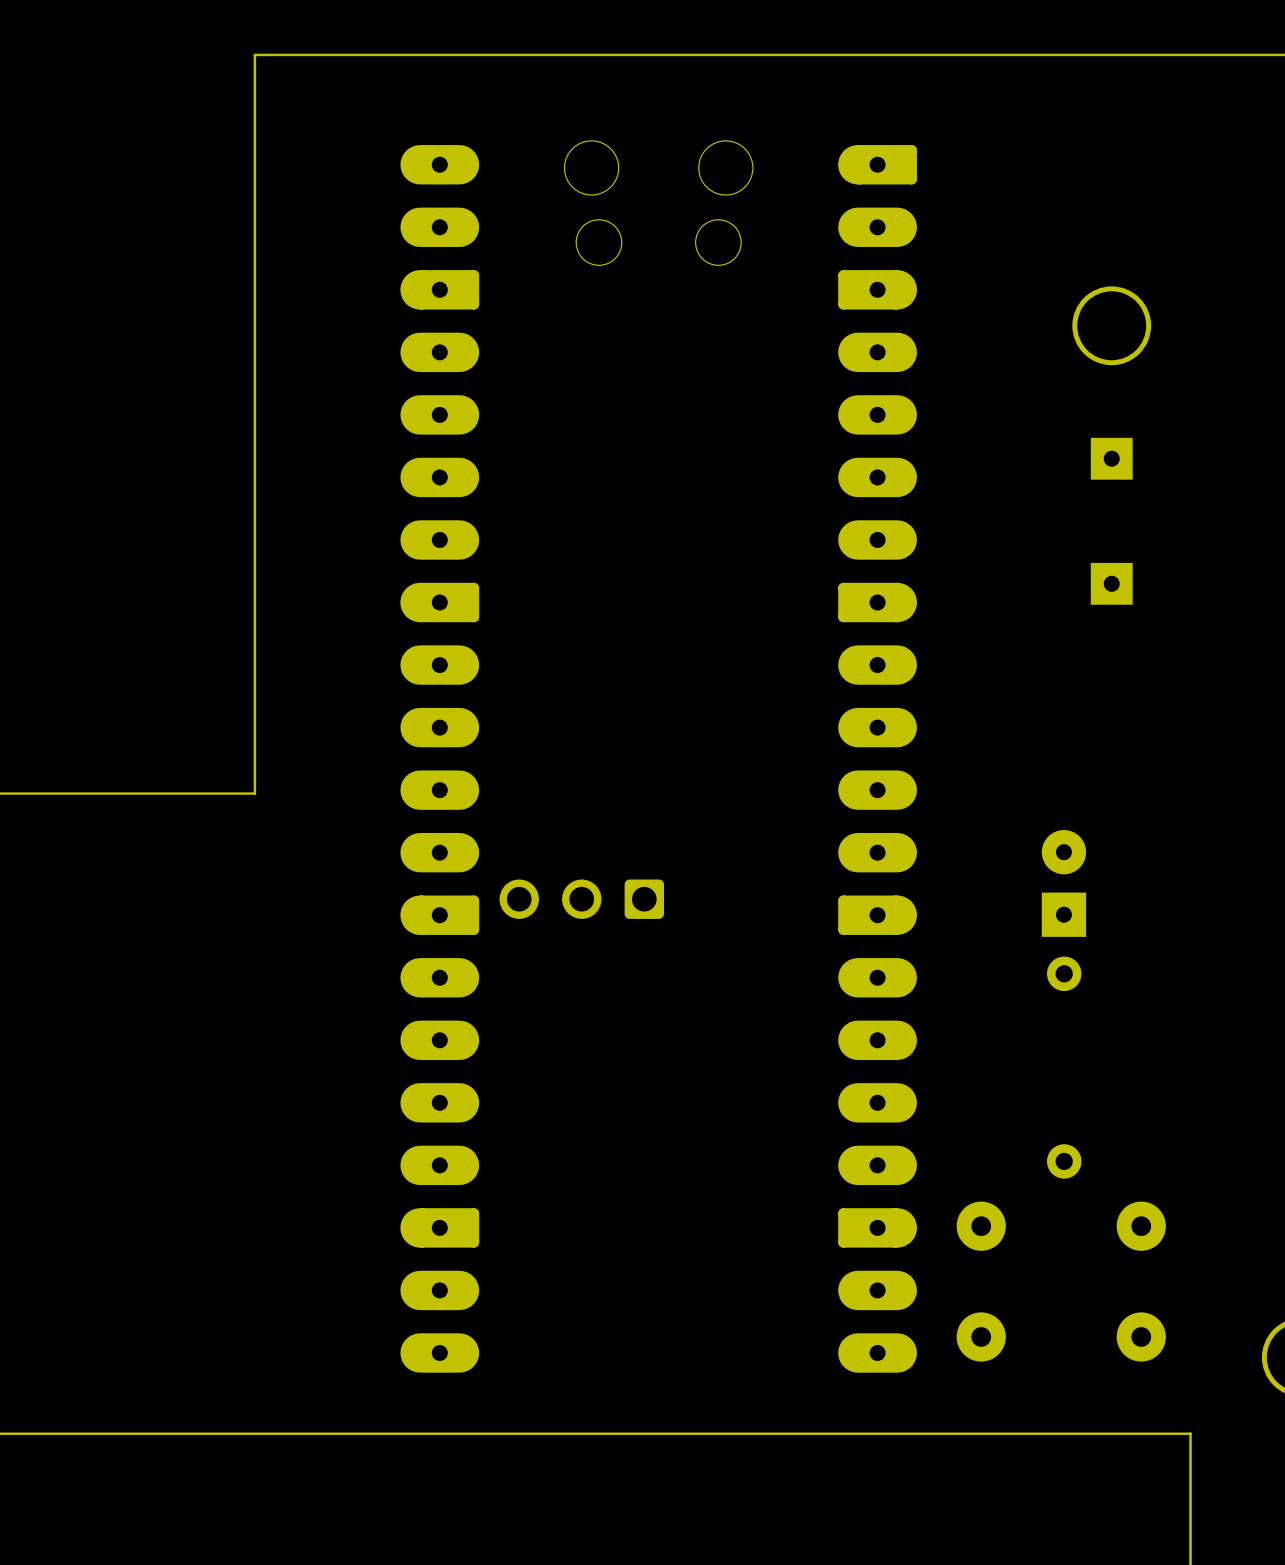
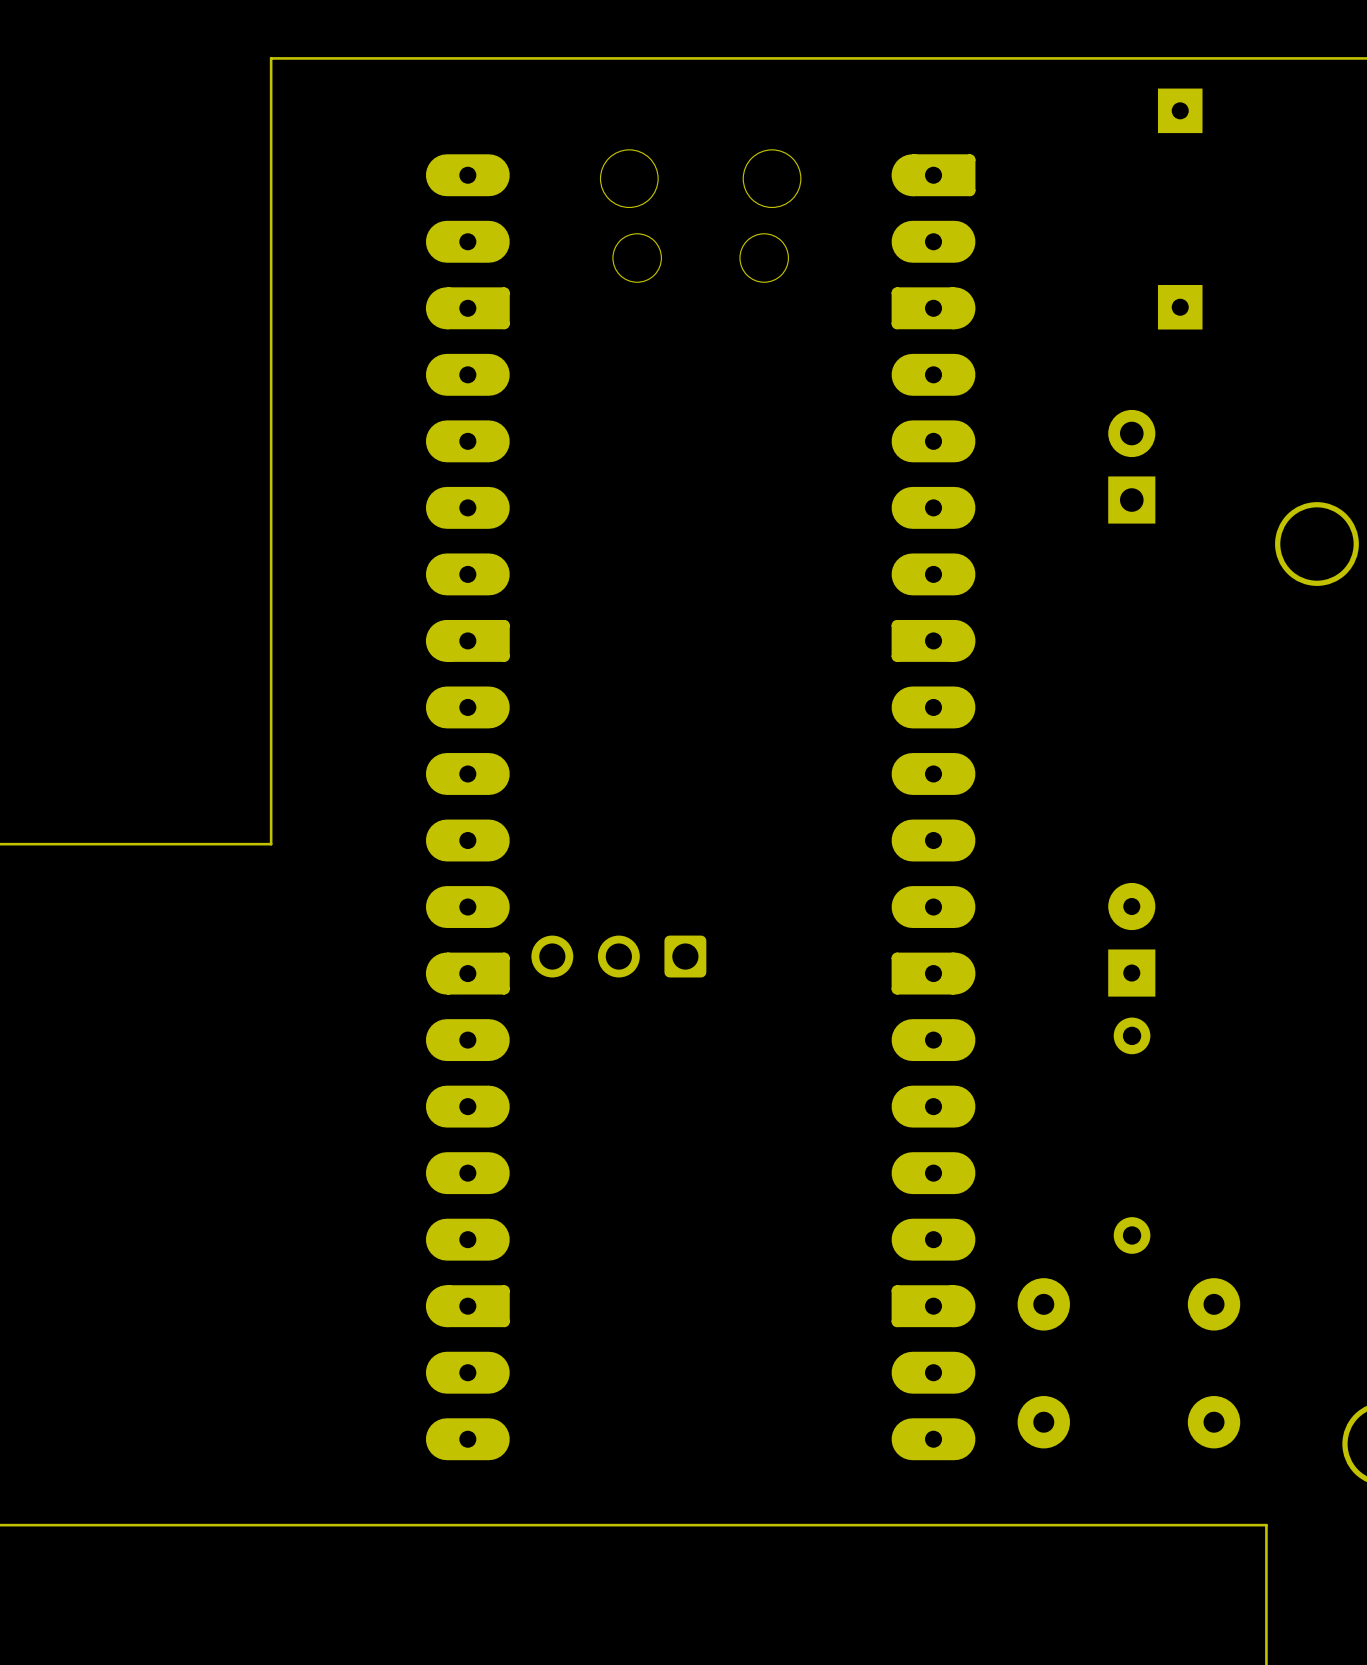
part: none -> (1180, 110)
part: none -> (1180, 307)
round board edge position: (1111, 325) -> (1316, 544)
part: none -> (1131, 466)
part: (1111, 458) -> none
part: (1111, 583) -> none

